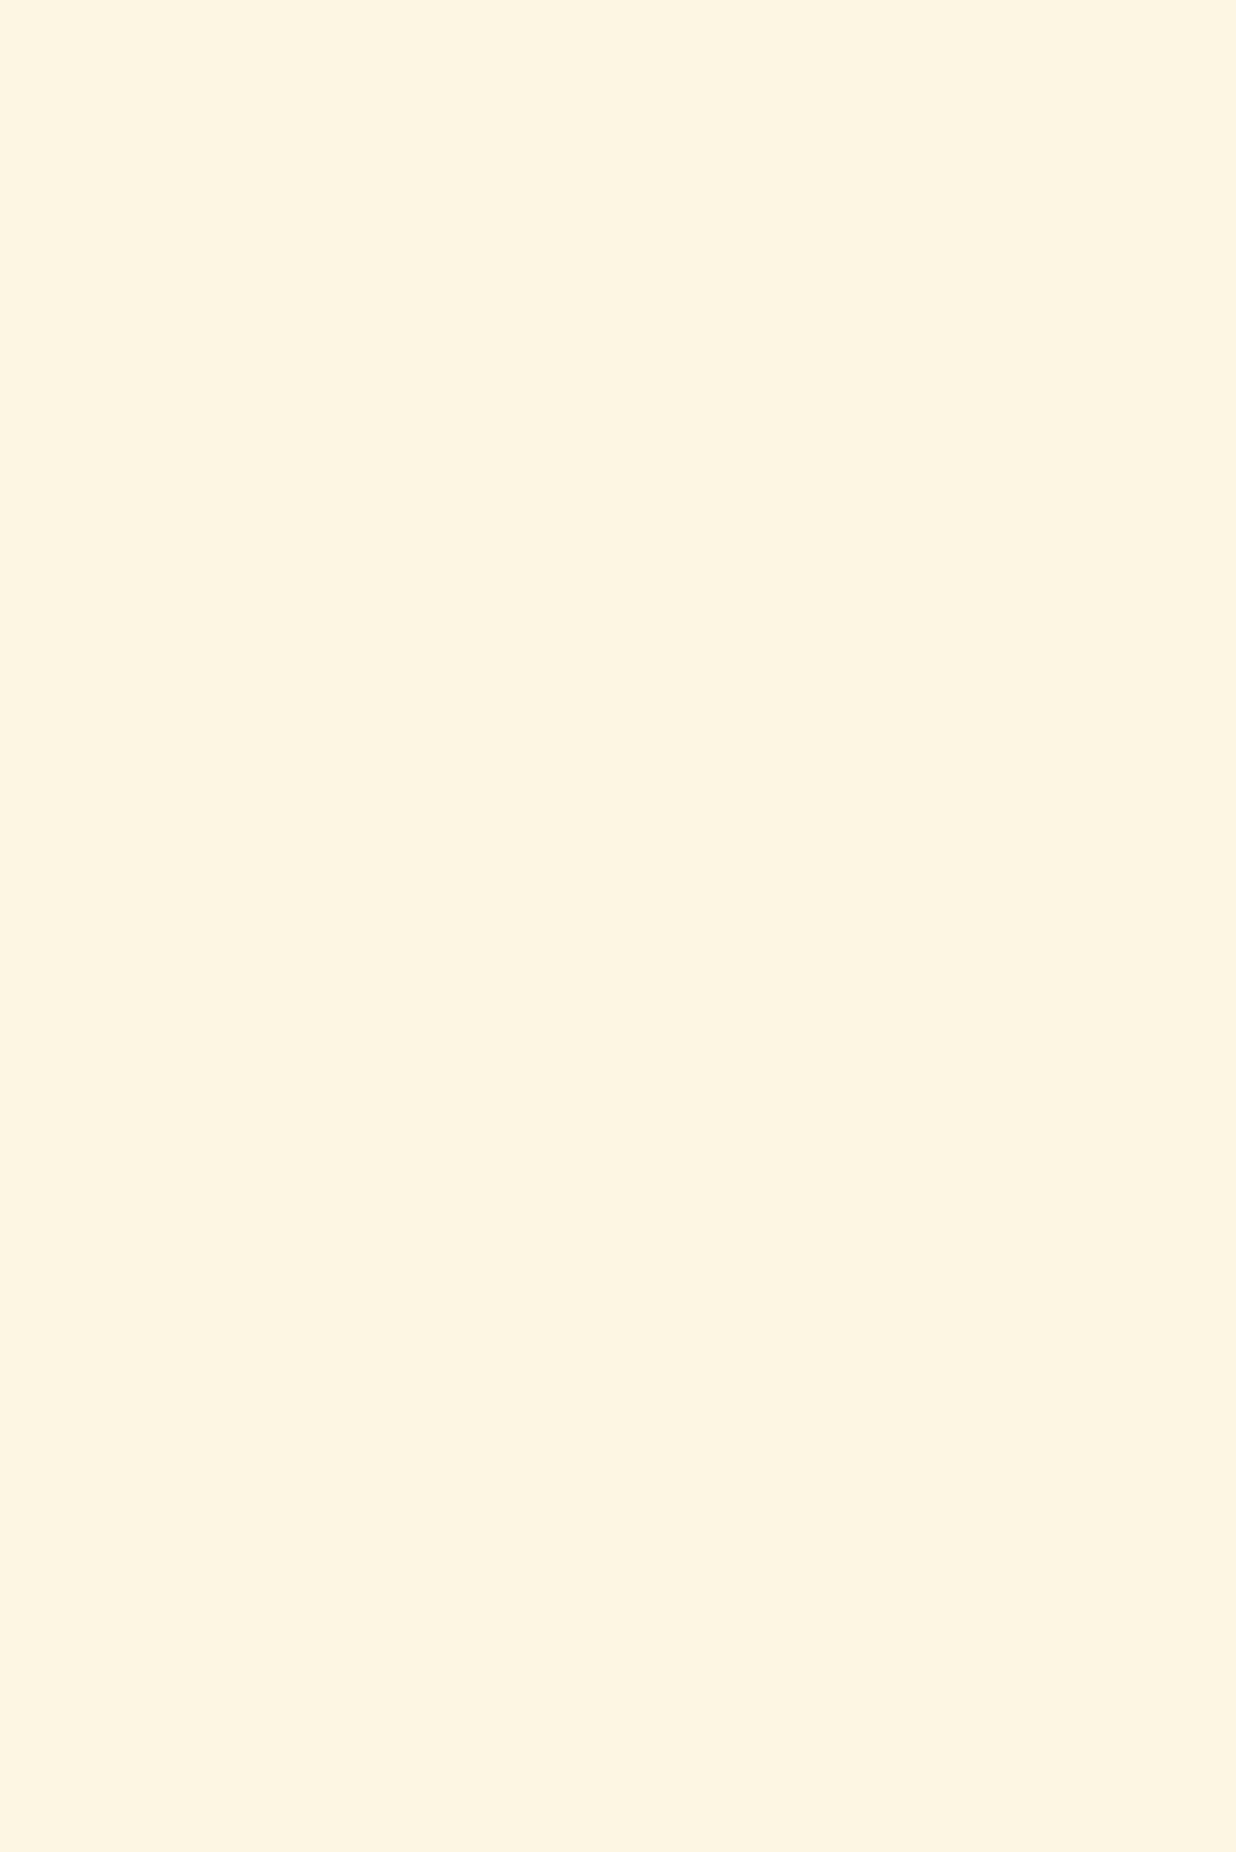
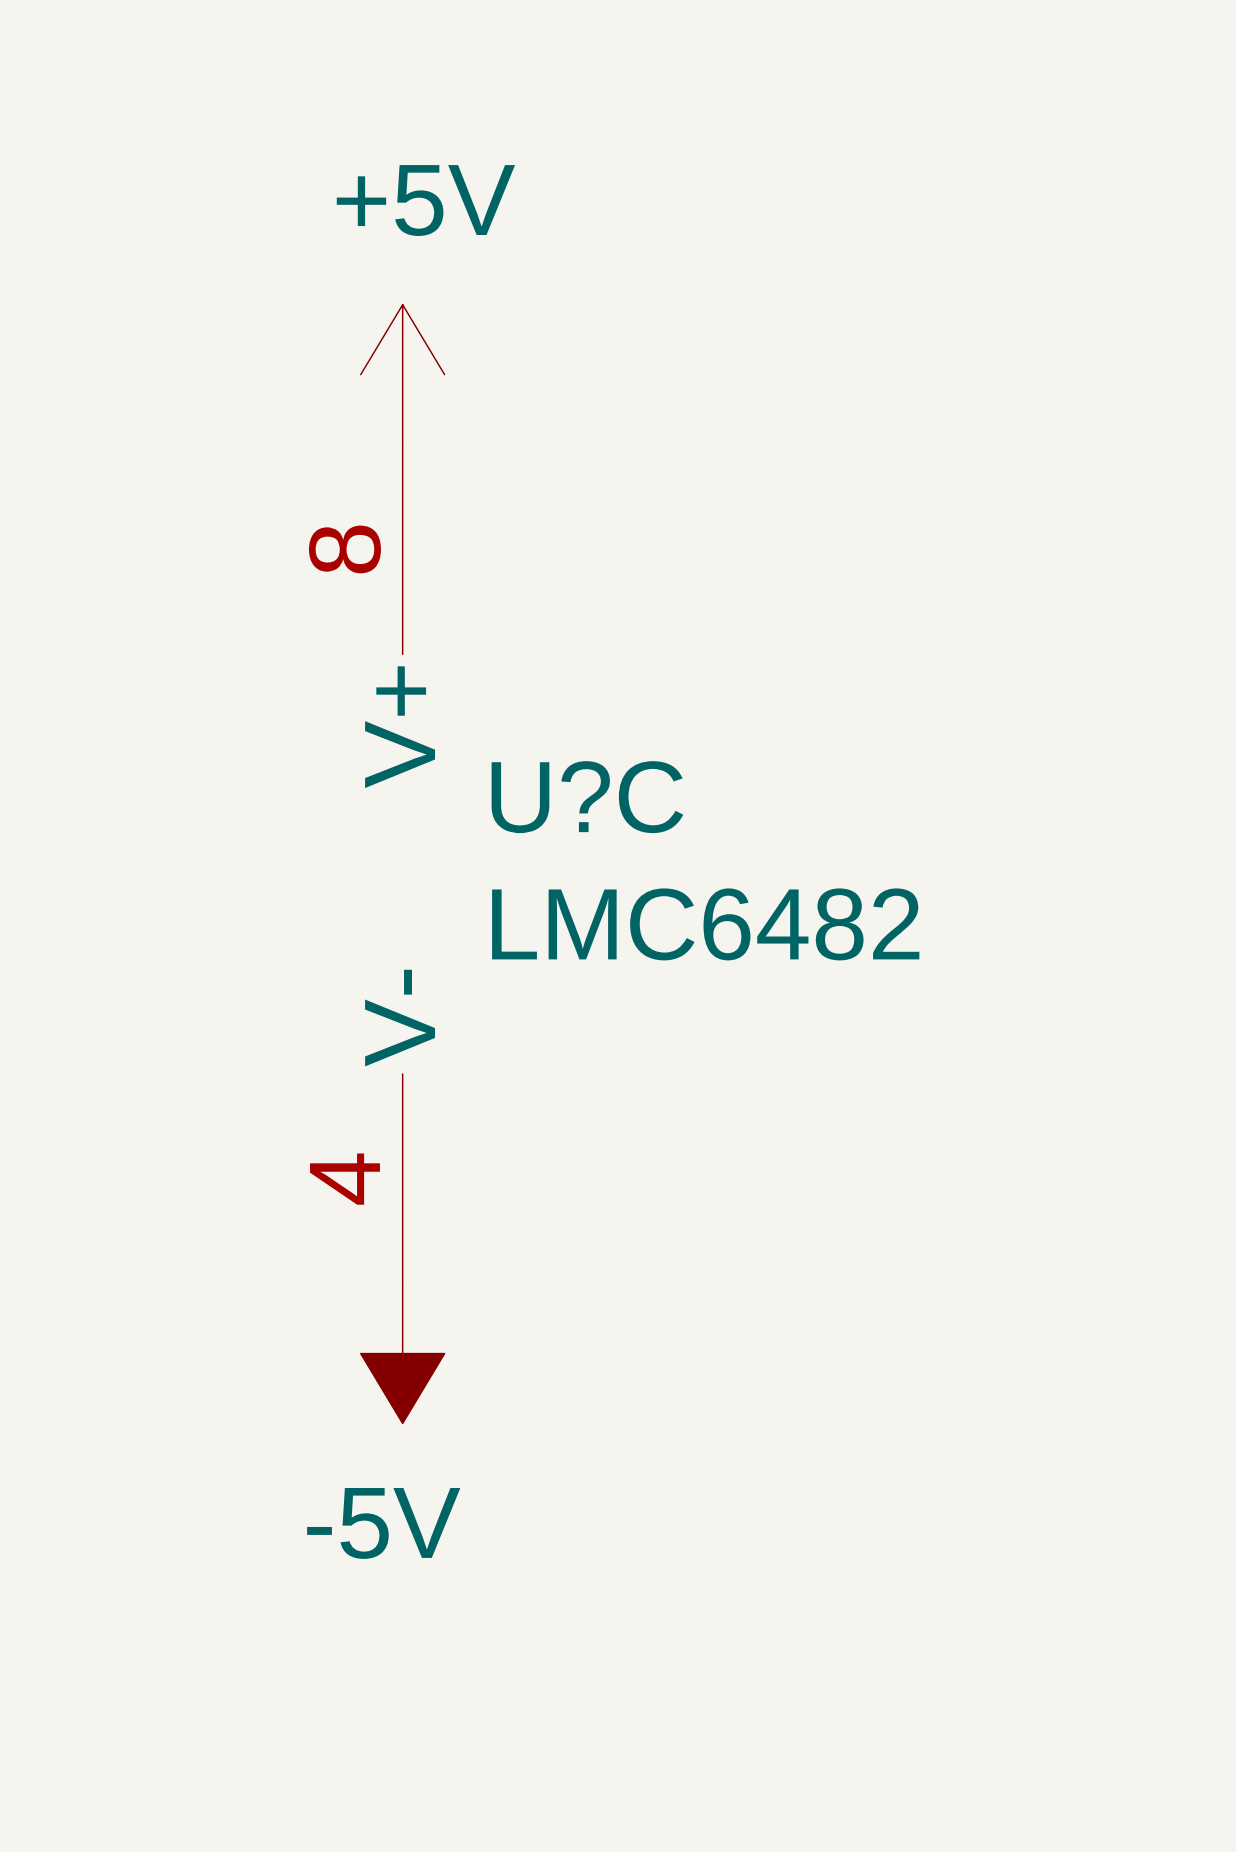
power symbol: none -> +5V (402, 374)
U?C: none -> LMC6482 (402, 864)
power symbol: none -> -5V (402, 1353)

